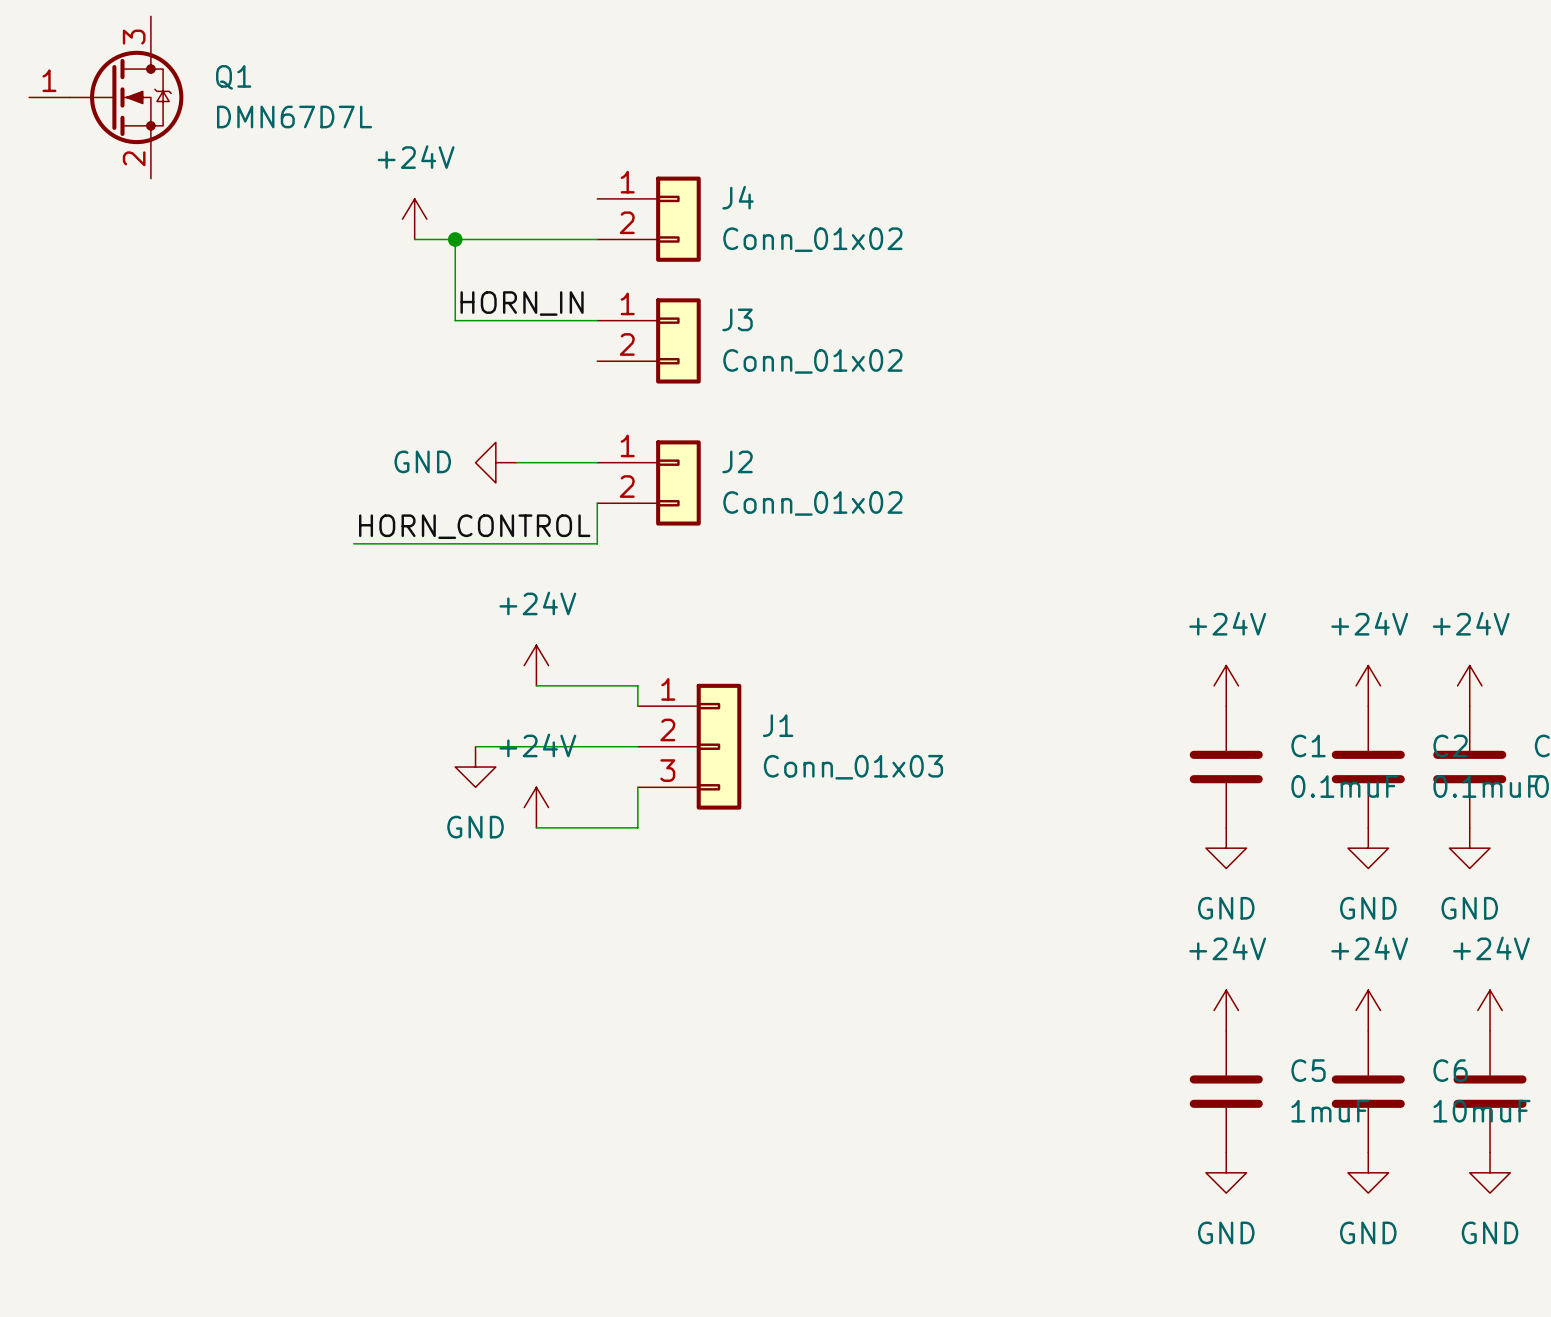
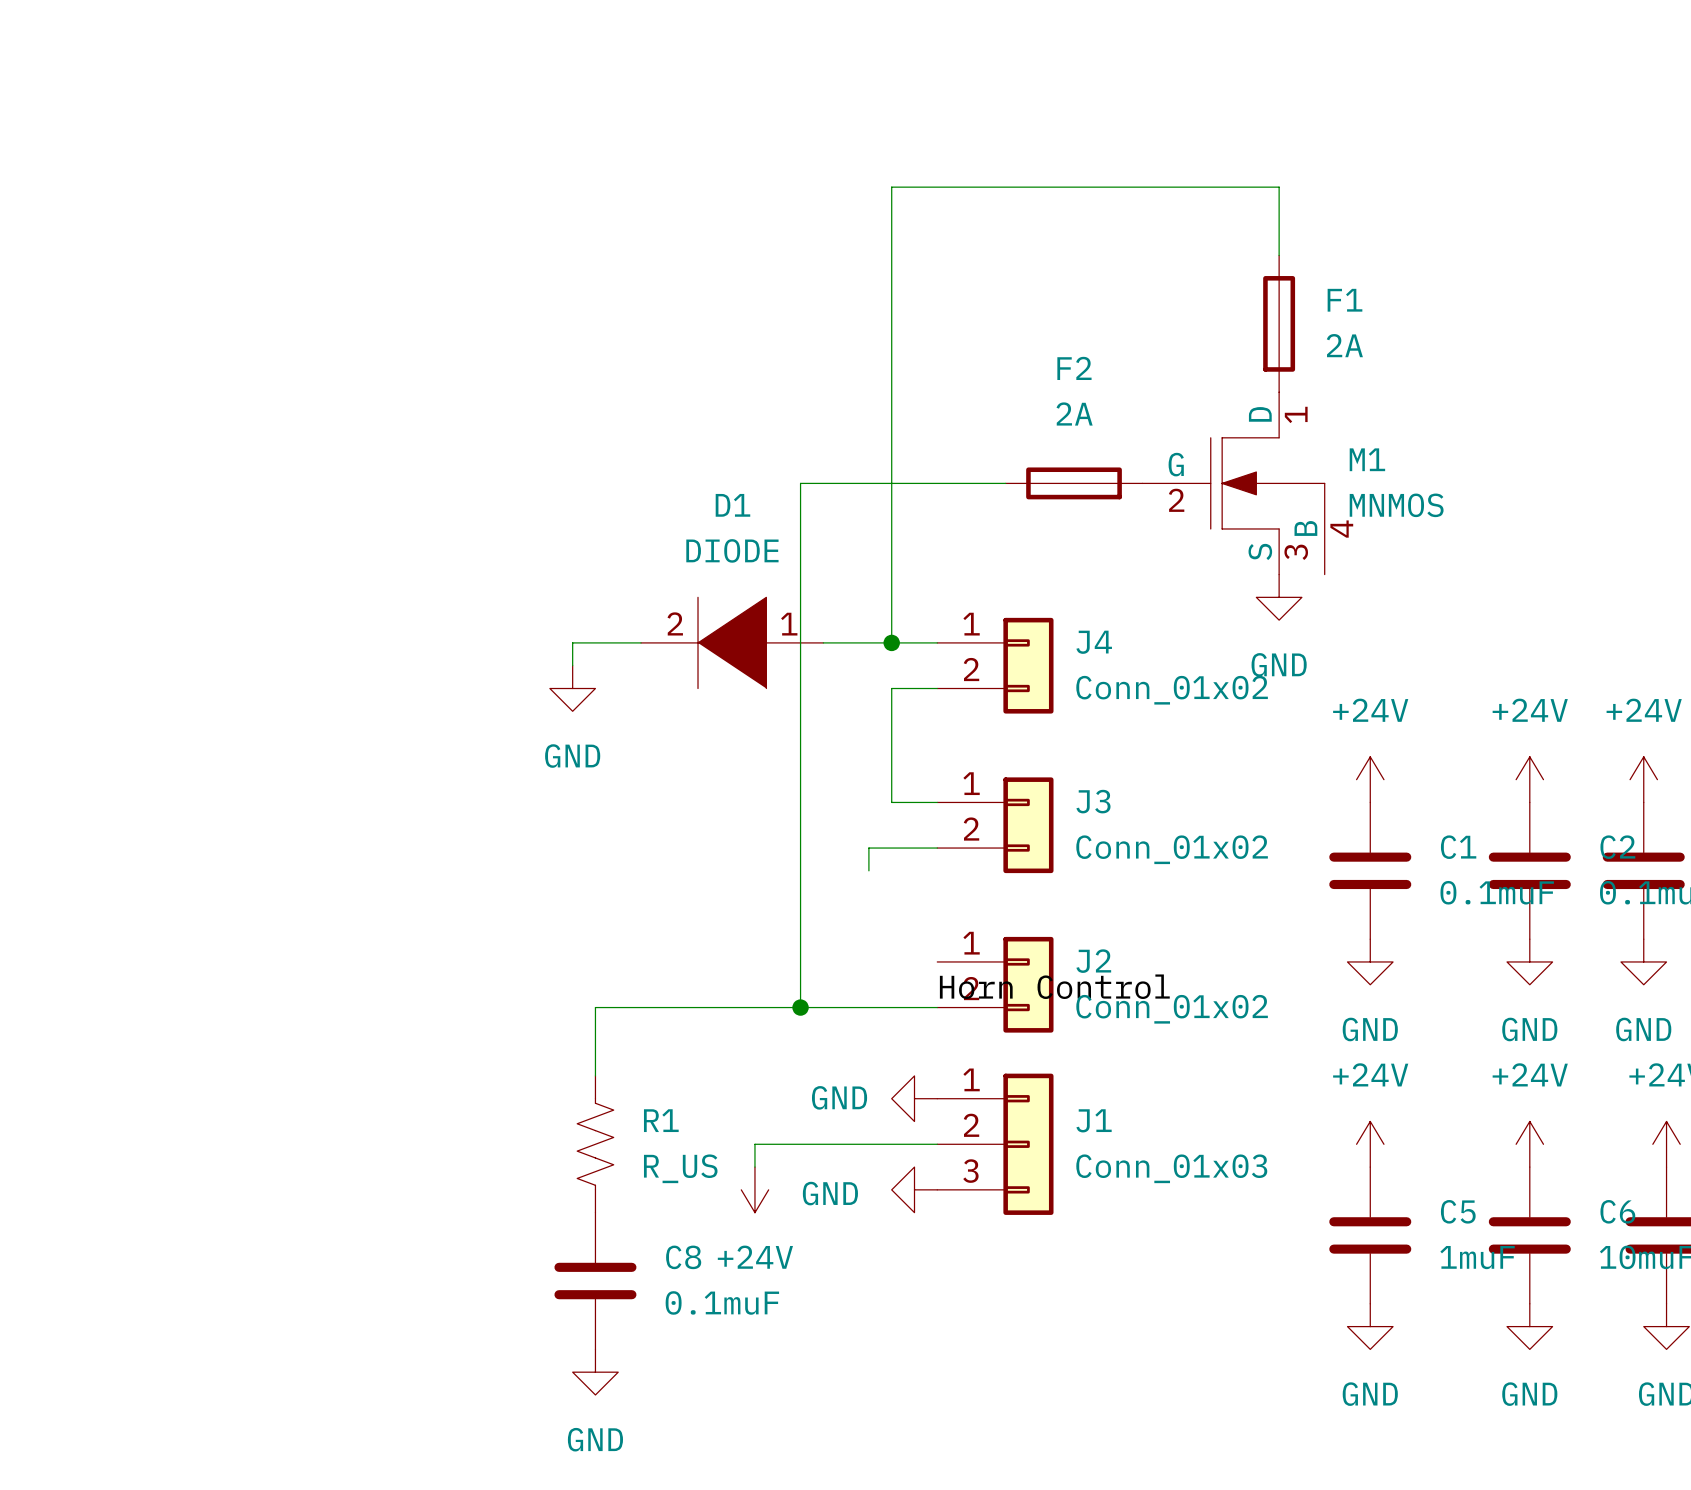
Q1: DMN67D7L (106, 97) -> none
power symbol: +24V (414, 219) -> none
J4 position: (649, 219) -> (995, 665)
wire: none -> (1279, 255) (1279, 187) (891, 187) (891, 642)
wire: (414, 239) (597, 239) -> none
wire: (455, 239) (455, 320) (597, 320) -> none
junction: (455, 239) -> none
F1: none -> 2A (1279, 323)
label: HORN_IN (522, 303) -> none
J3 position: (649, 340) -> (995, 825)
wire: none -> (1005, 483) (800, 483) (800, 1007)
F2: none -> 2A (1074, 483)
M1: none -> MNMOS (1233, 483)
power symbol: GND (495, 462) -> none
wire: (516, 462) (597, 462) -> none
J2 position: (649, 482) -> (995, 984)
wire: (597, 503) (597, 543) (353, 543) -> none
power symbol: none -> GND (1279, 597)
label: HORN_CONTROL (474, 526) -> none
wire: none -> (641, 642) (572, 642) (572, 665)
D1: none -> DIODE (732, 642)
wire: none -> (823, 642) (937, 642)
junction: none -> (891, 642)
power symbol: none -> GND (572, 688)
wire: none -> (937, 688) (891, 688) (891, 802) (937, 802)
power symbol: +24V (536, 665) -> none
wire: (536, 685) (637, 685) (637, 706) -> none
wire: (475, 746) (637, 746) -> none
J1 position: (689, 746) -> (995, 1144)
wire: none -> (937, 848) (868, 848) (868, 870)
power symbol: GND (475, 767) -> none
wire: (637, 787) (637, 827) (536, 827) -> none
power symbol: +24V (536, 807) -> none
label: none -> Horn Control (1054, 986)
junction: none -> (800, 1007)
wire: none -> (937, 1007) (595, 1007) (595, 1075)
power symbol: none -> GND (914, 1098)
R1: none -> R_US (595, 1144)
wire: none -> (937, 1144) (754, 1144) (754, 1167)
power symbol: none -> +24V (754, 1189)
power symbol: none -> GND (914, 1189)
C8: none -> 0.1muF (595, 1281)
power symbol: none -> GND (595, 1372)

